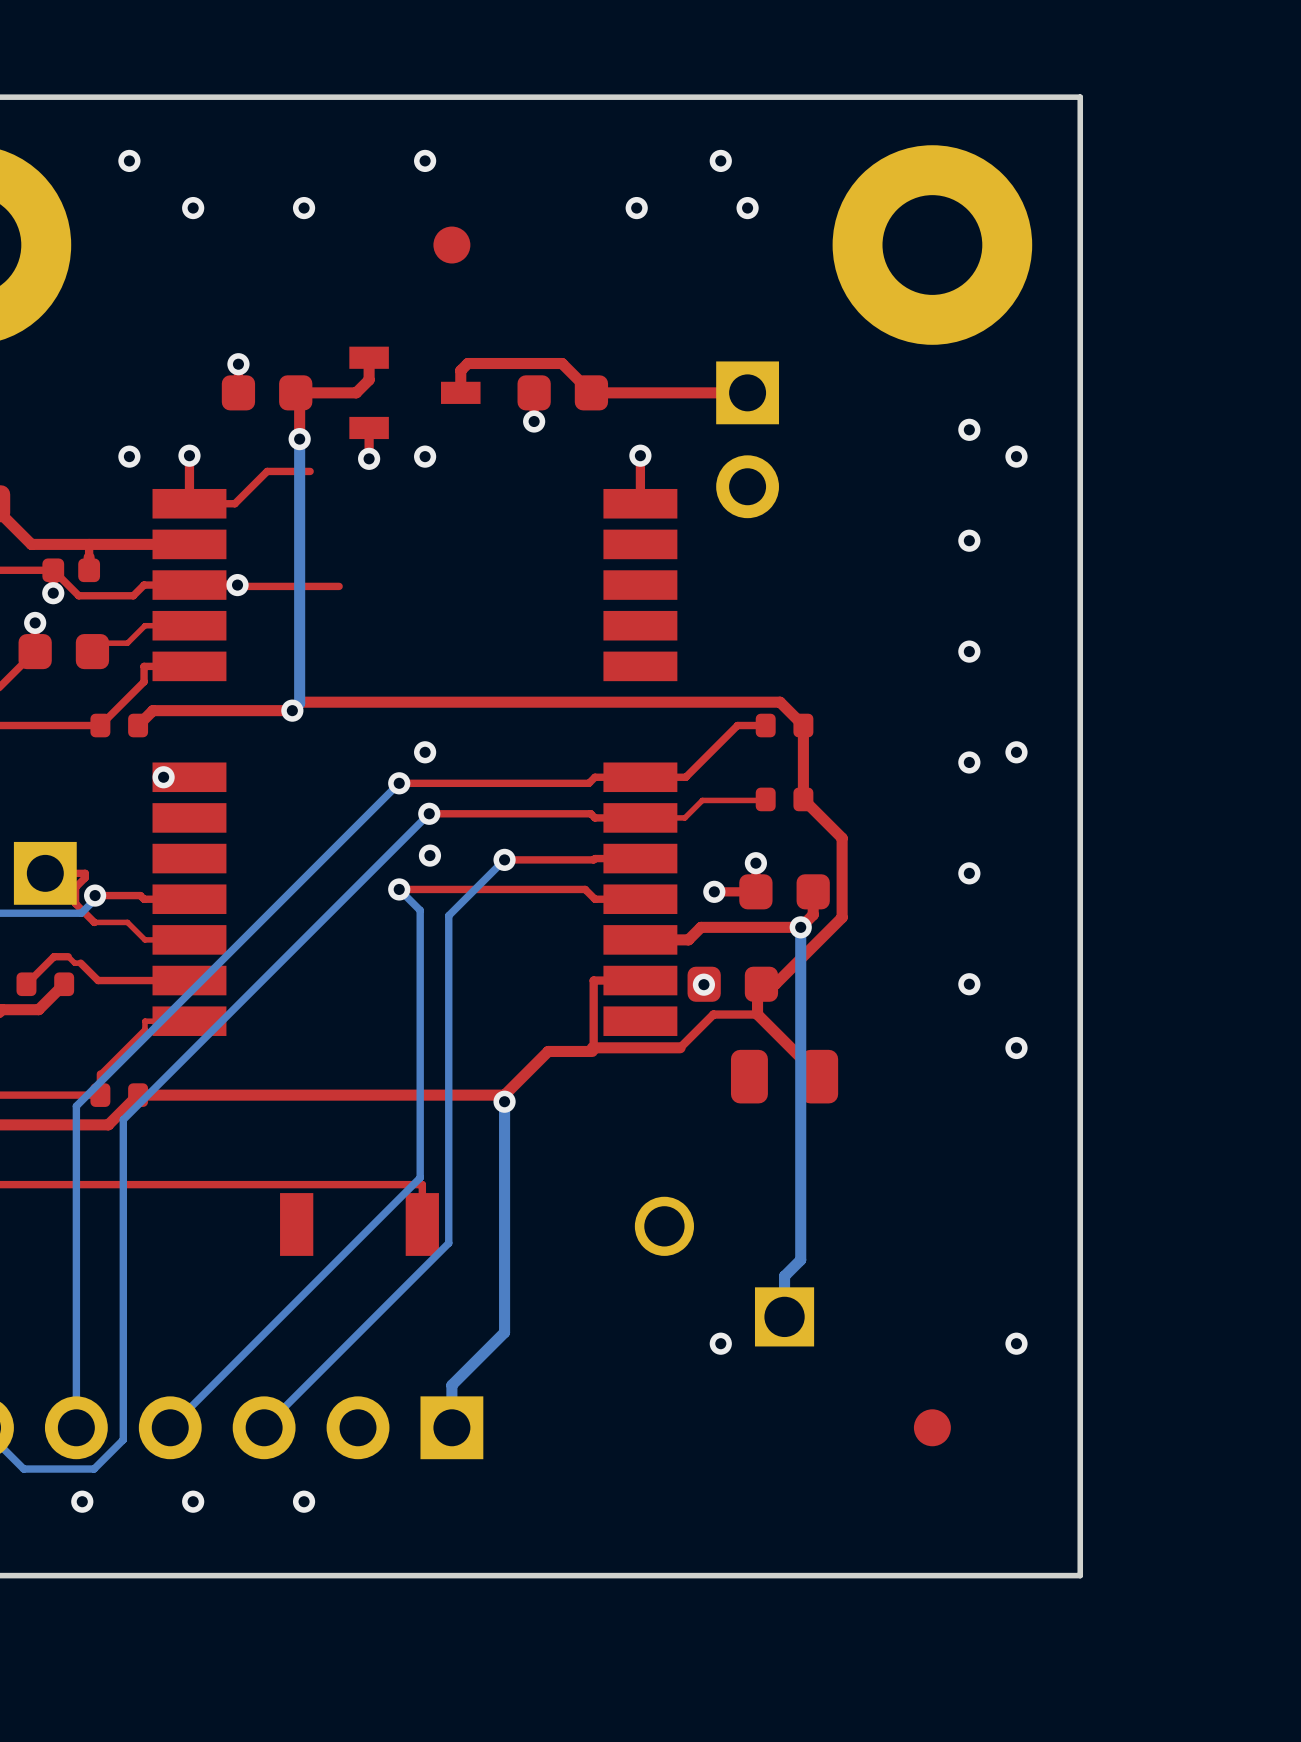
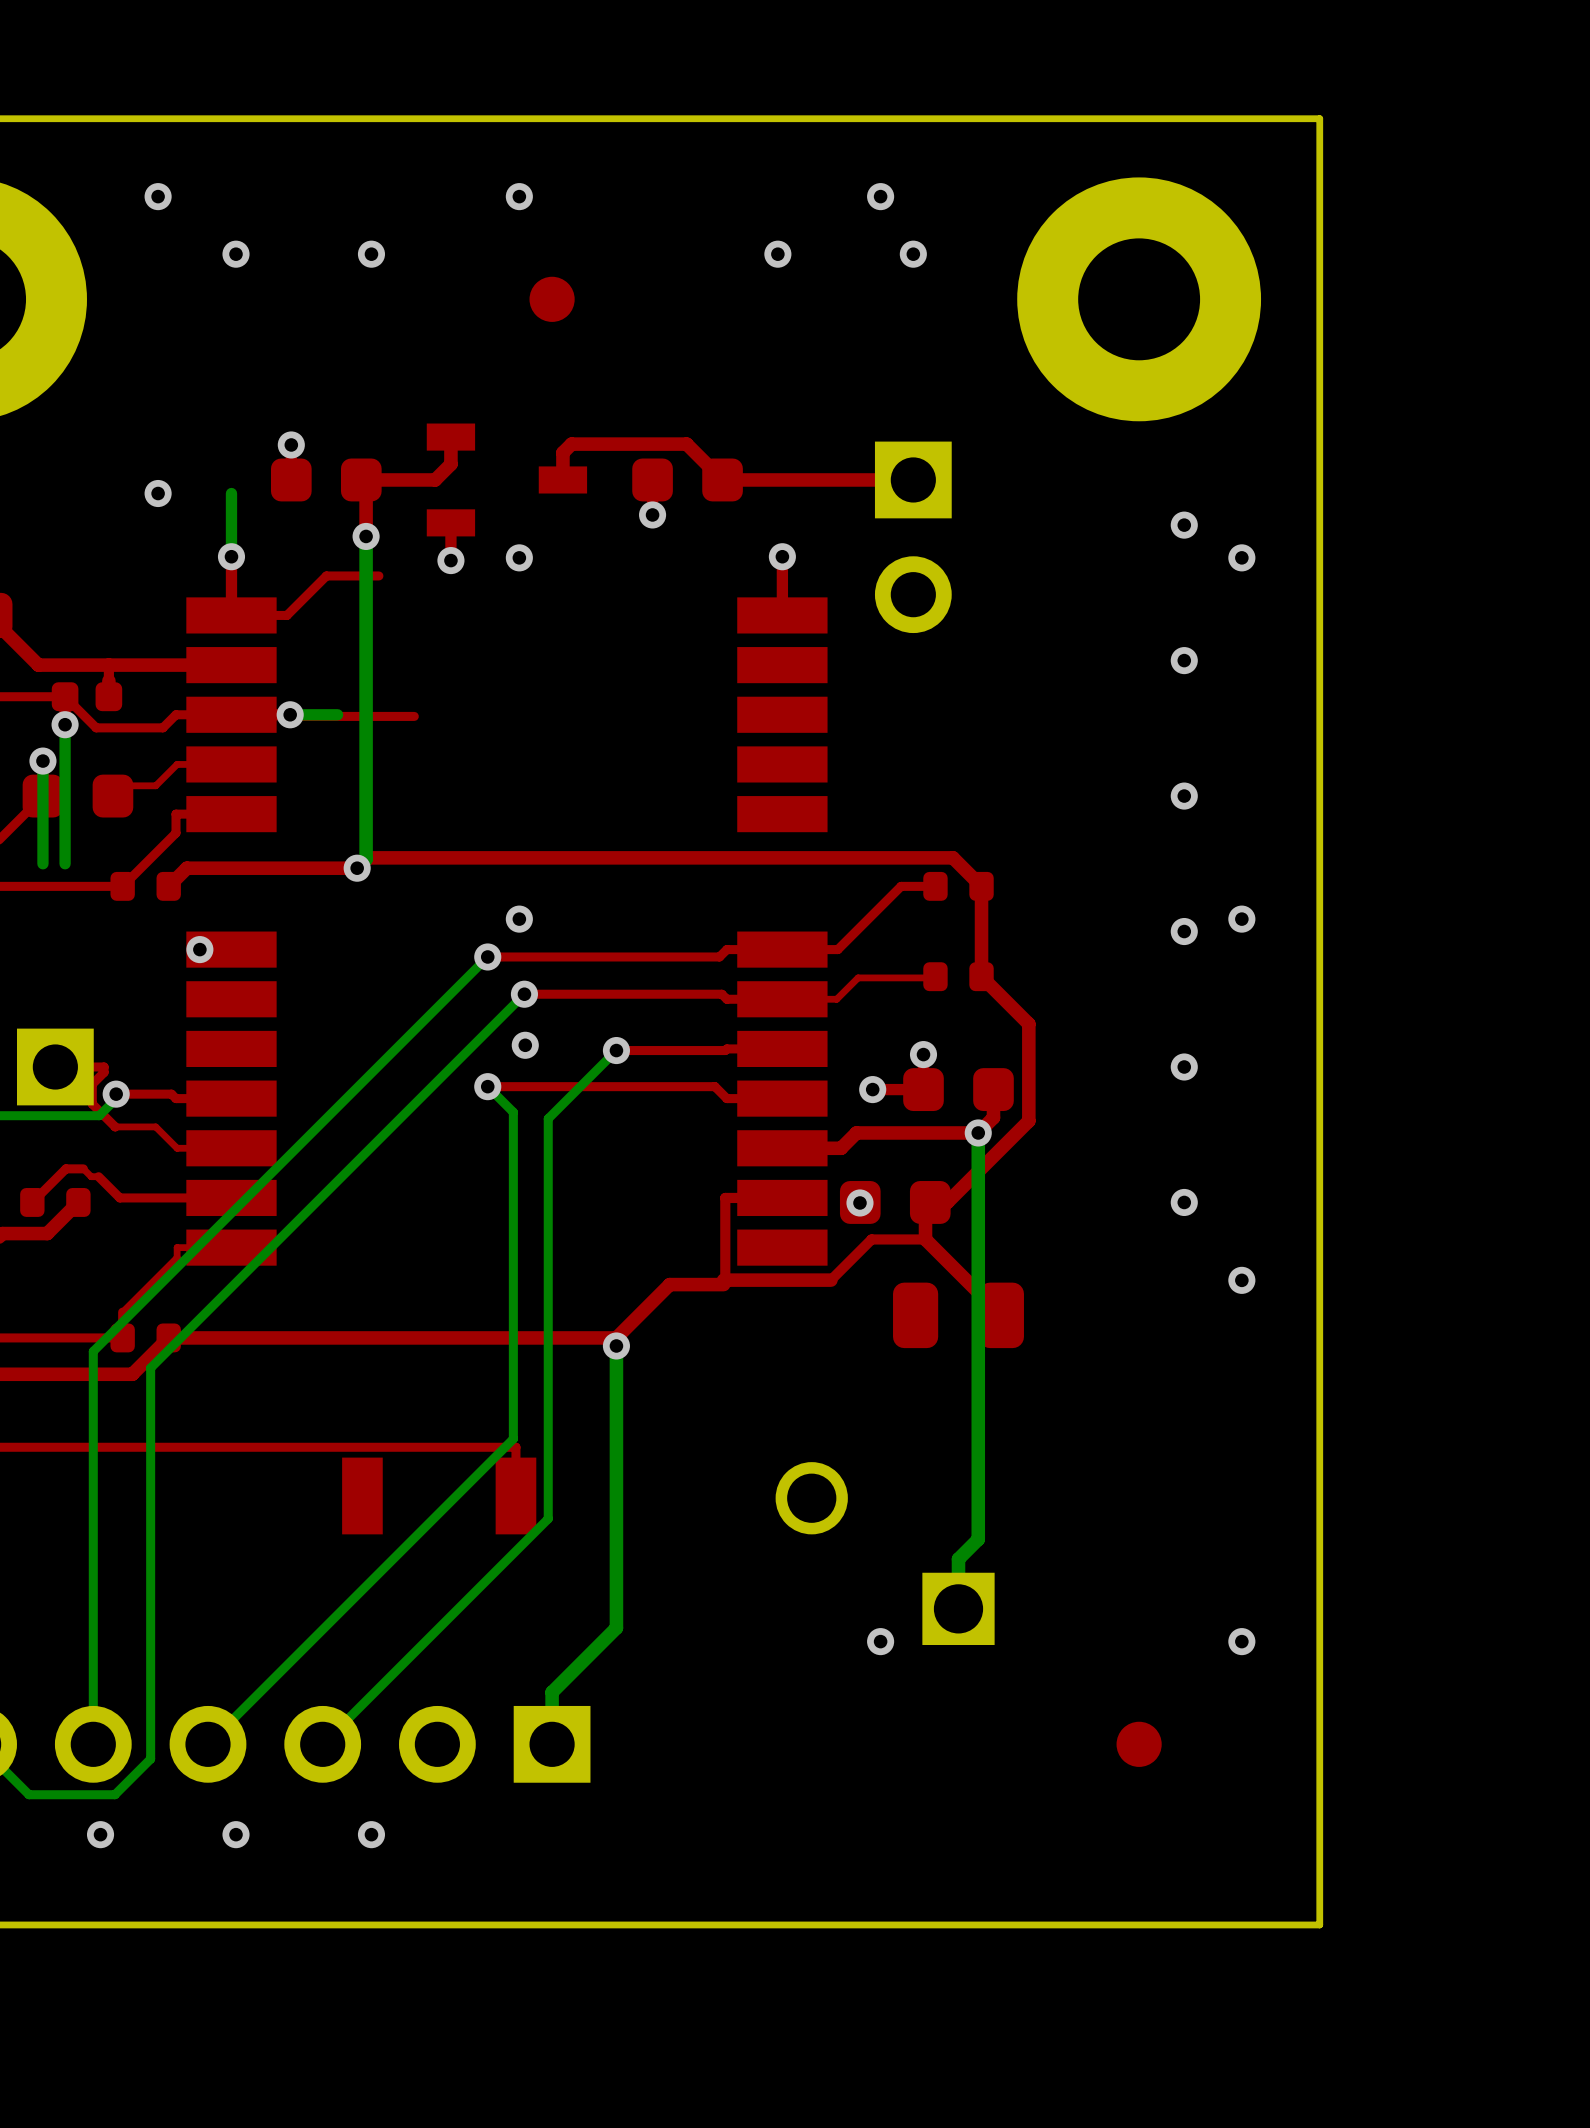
bottom track: none -> (231, 493) (231, 556)
via position: (129, 456) -> (158, 493)
bottom track: none -> (337, 714) (290, 714)
bottom track: none -> (65, 724) (65, 863)
bottom track: none -> (42, 761) (42, 863)

